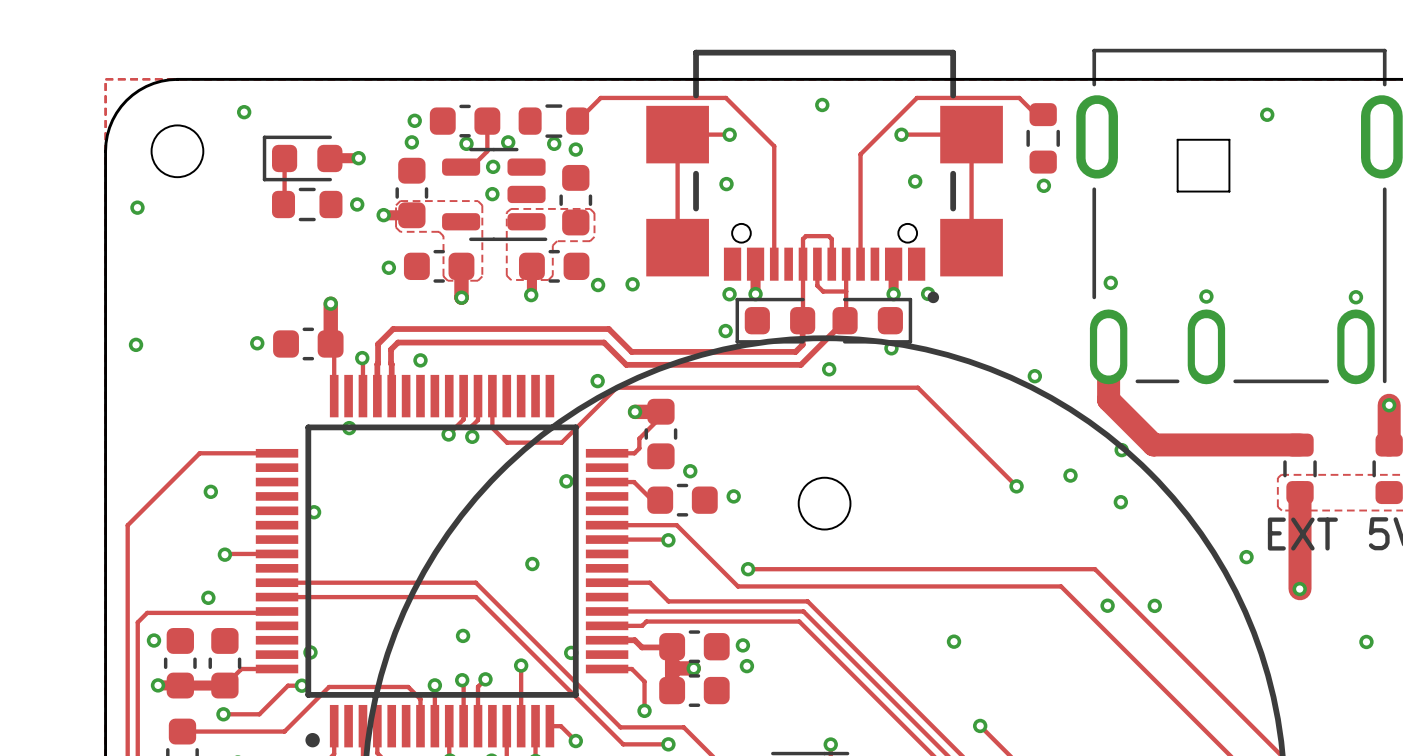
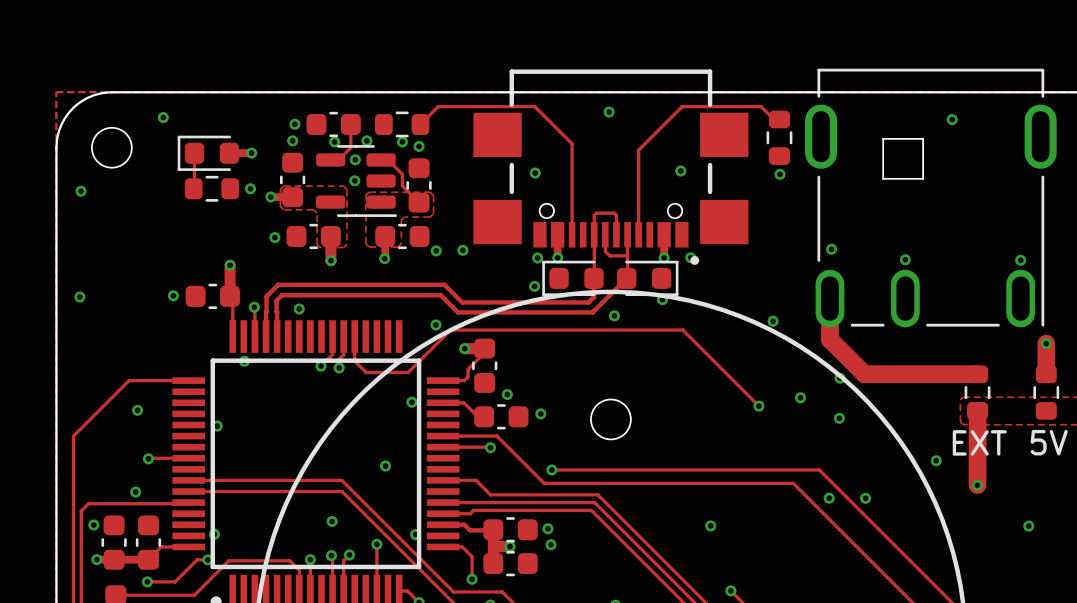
track: (729, 134) (677, 134) (677, 247) -> none
via: (729, 134) -> none
track: (901, 134) (971, 134) (971, 247) -> none
via: (901, 134) -> none
track: none -> (381, 159) (388, 159) (402, 174) (402, 186) (419, 202)

